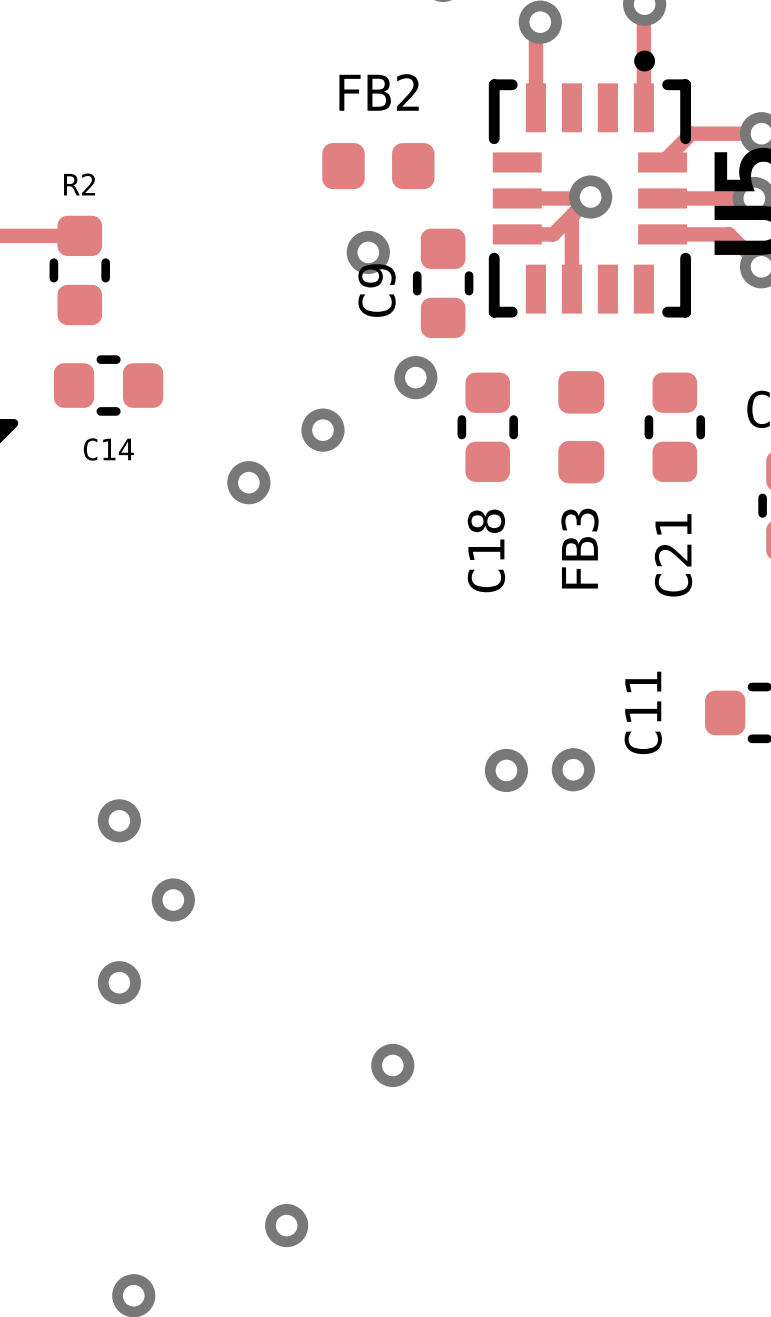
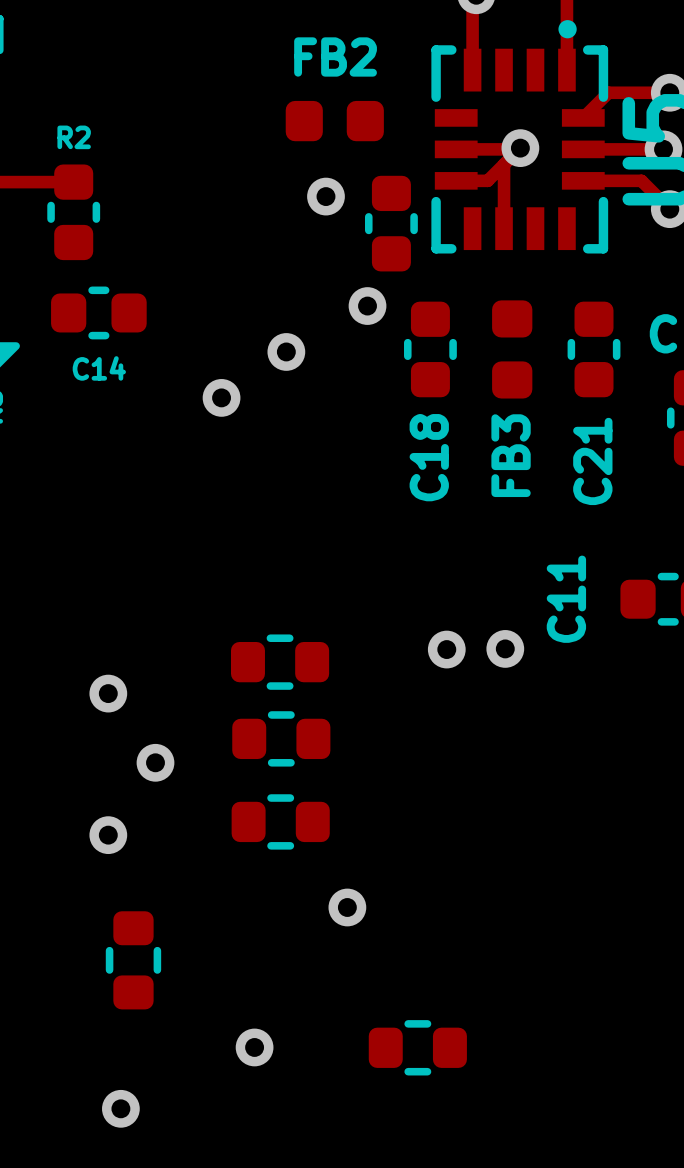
C9 name: C9 (377, 290) -> none
part: none -> (280, 662)
part: none -> (281, 738)
part: none -> (280, 821)
part: none -> (133, 960)
part: none -> (417, 1047)

